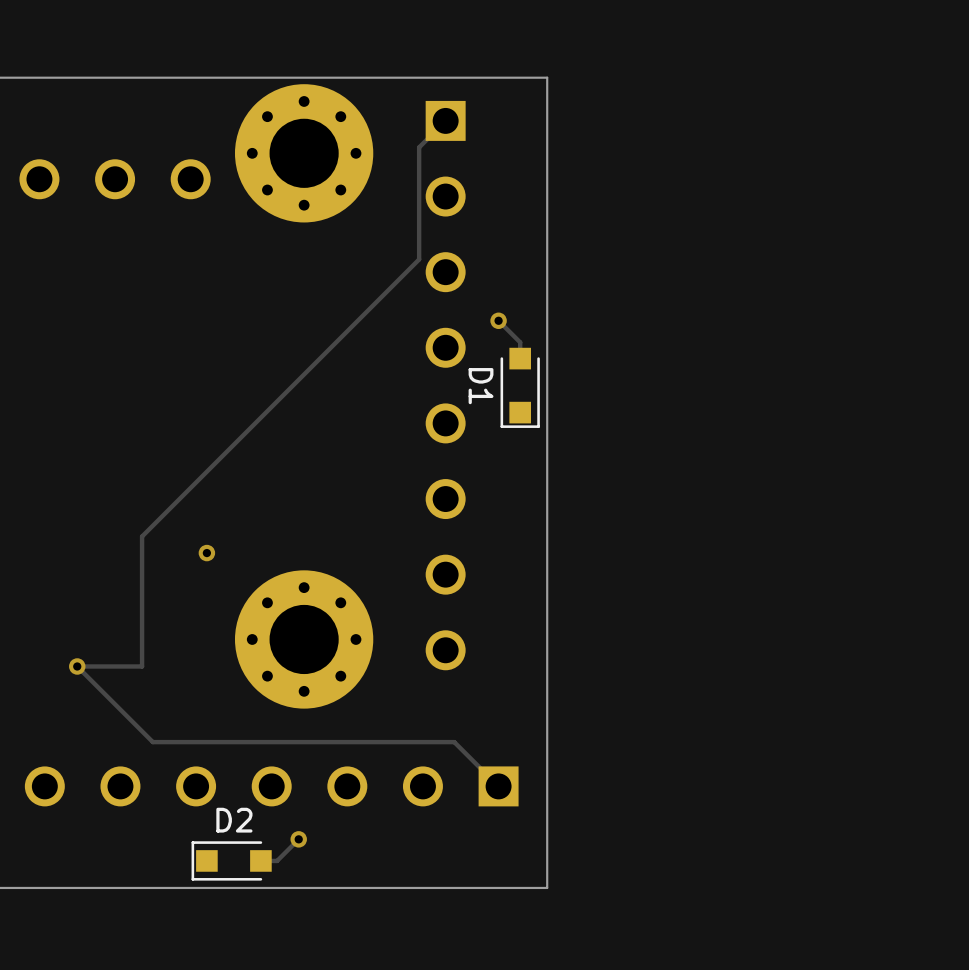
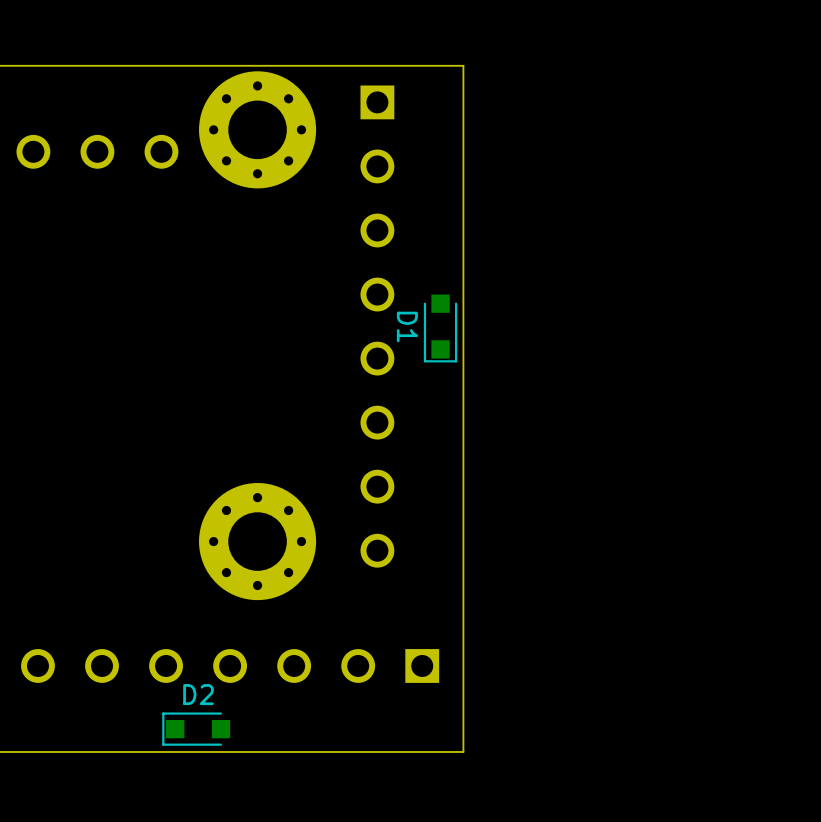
track: (445, 120) (419, 147) (419, 259) (142, 536) (142, 666) (77, 666) (152, 742) (454, 742) (498, 786) -> none
track: (498, 320) (520, 342) (520, 358) -> none
via: (498, 320) -> none
via: (206, 553) -> none
via: (77, 666) -> none
track: (298, 839) (277, 860) (260, 860) -> none
via: (298, 839) -> none

